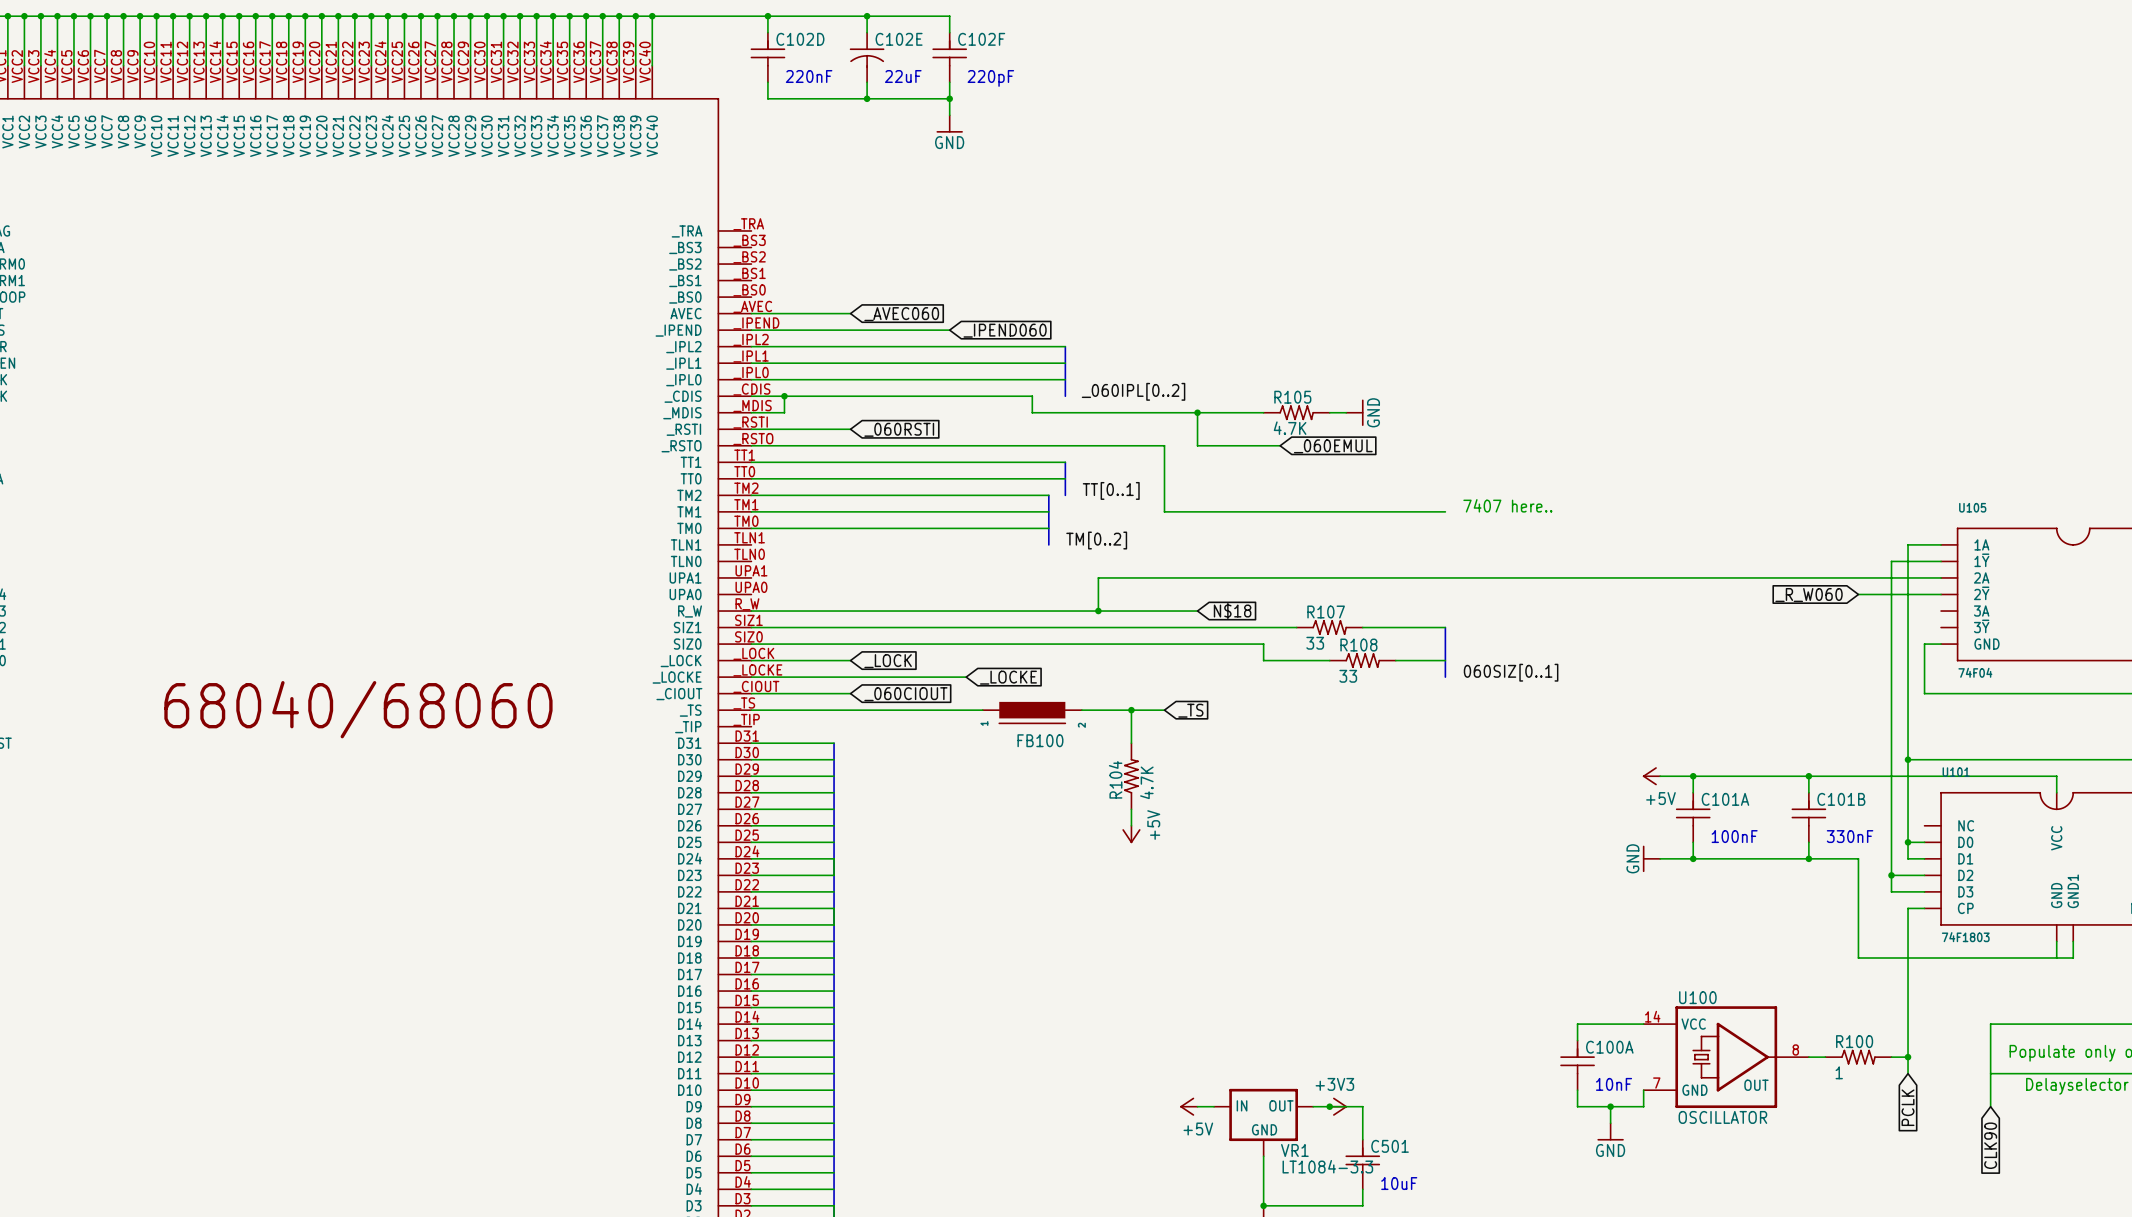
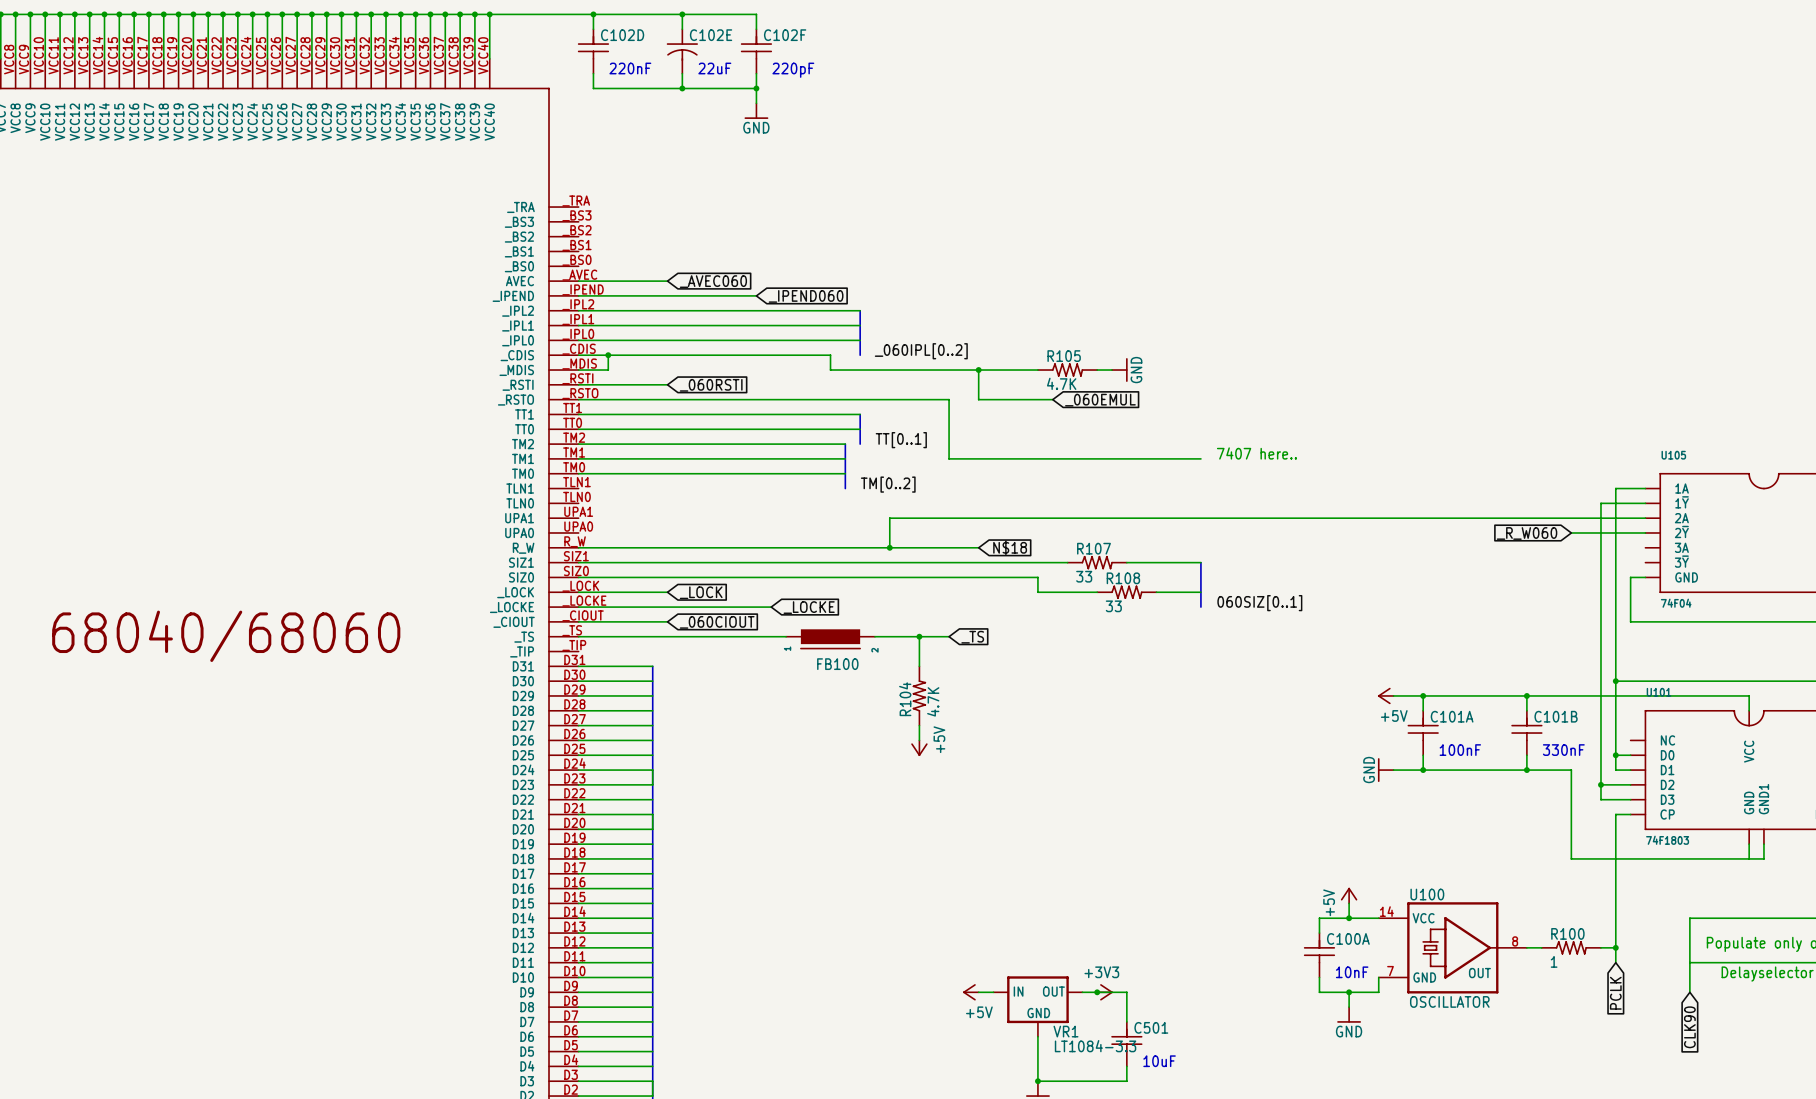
power symbol: none -> +5V (1349, 895)
wire: none -> (1349, 903) (1349, 918)
junction: none -> (1349, 918)

